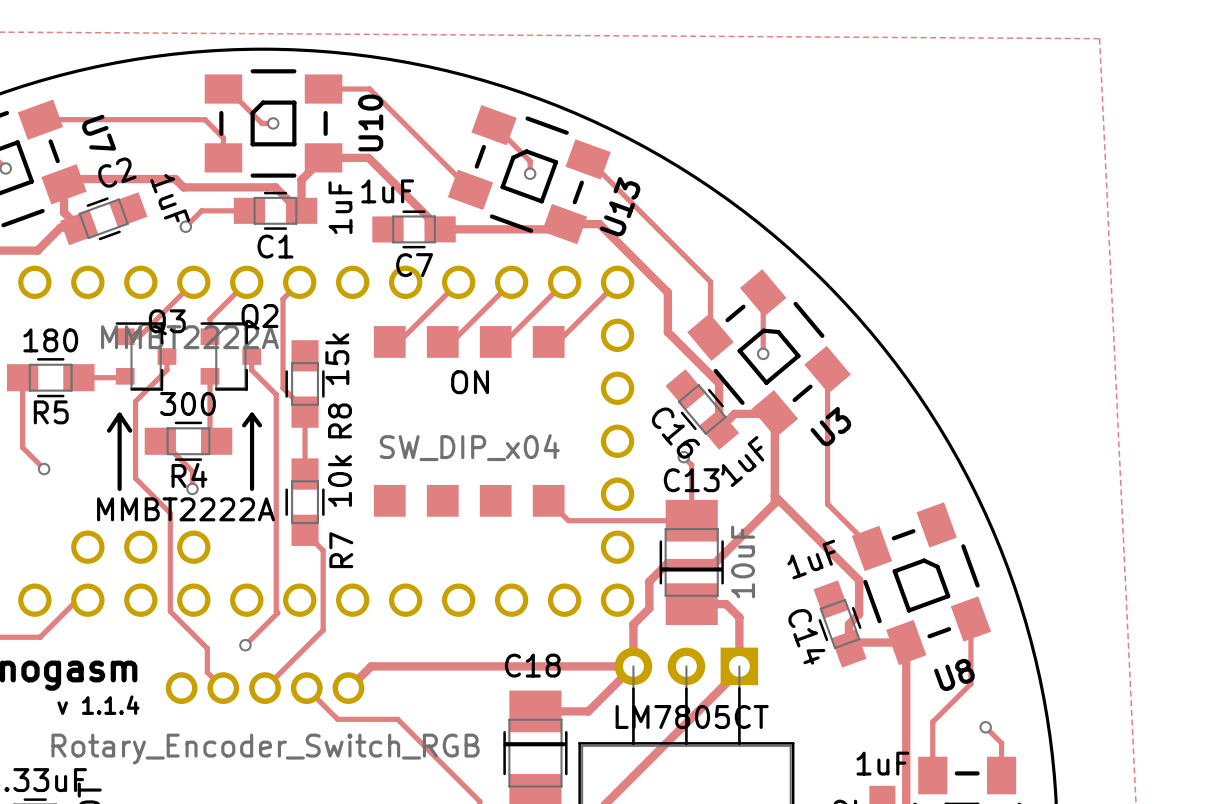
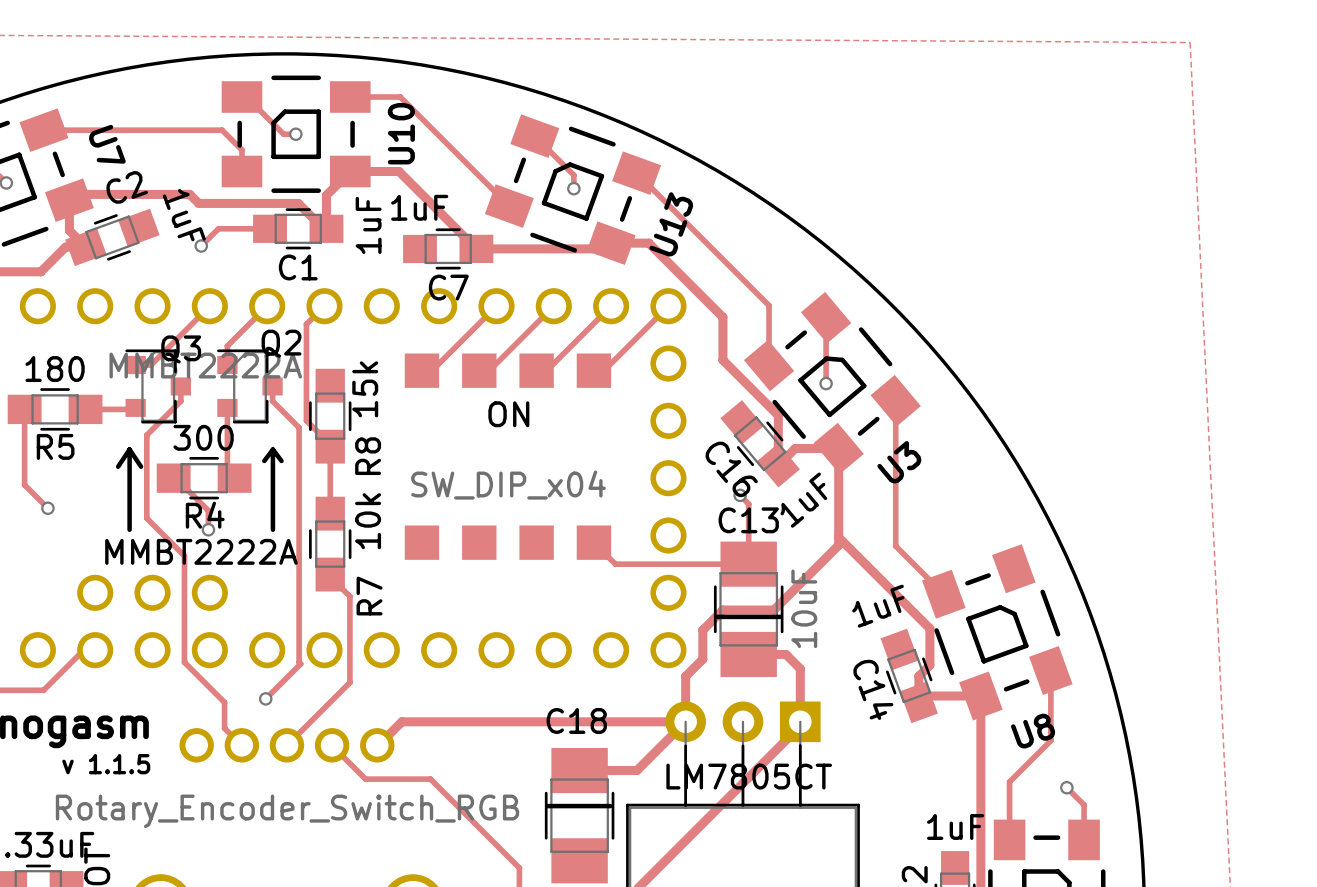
text: v 1.1.4 (98, 705) -> v 1.1.5 (106, 764)

